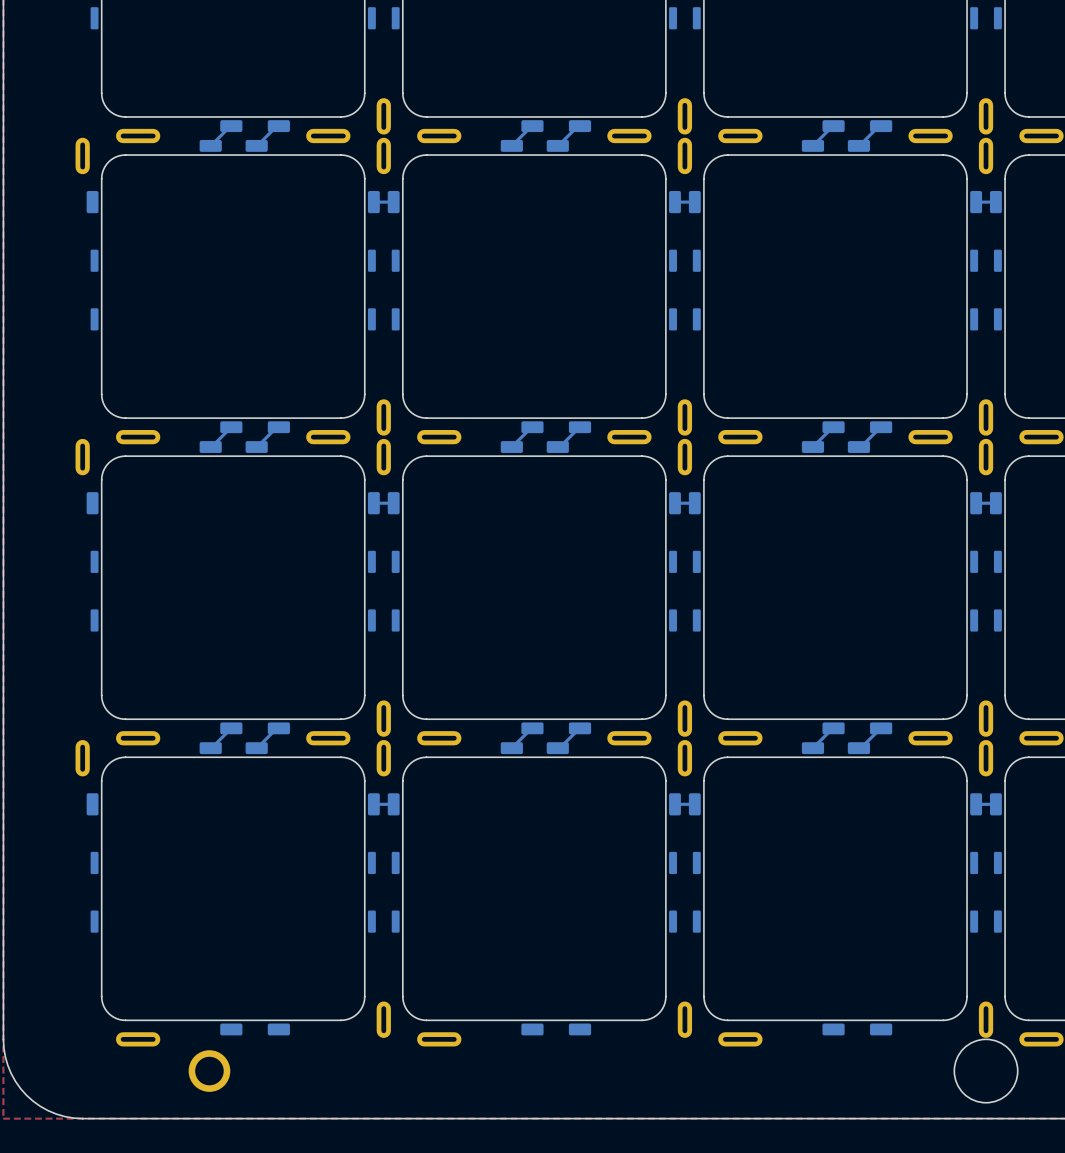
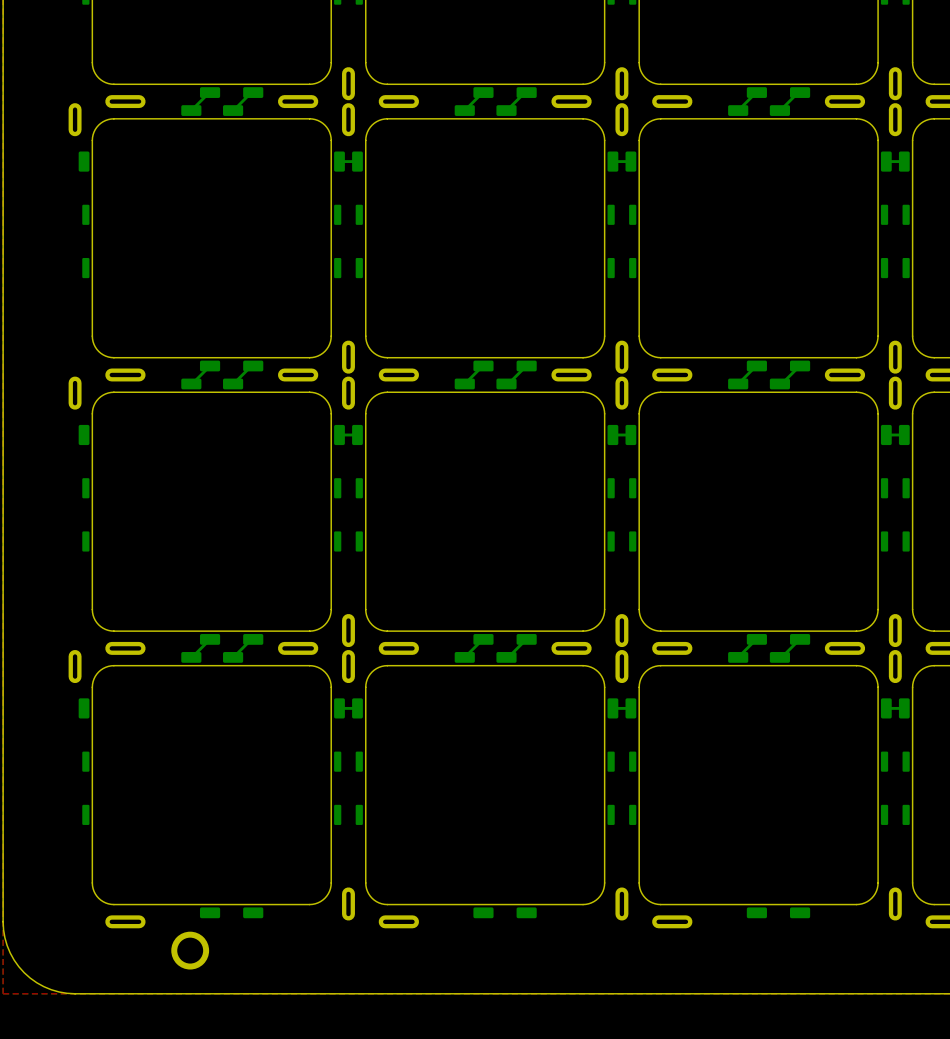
round board edge: [953, 1038, 1019, 1104] -> none

